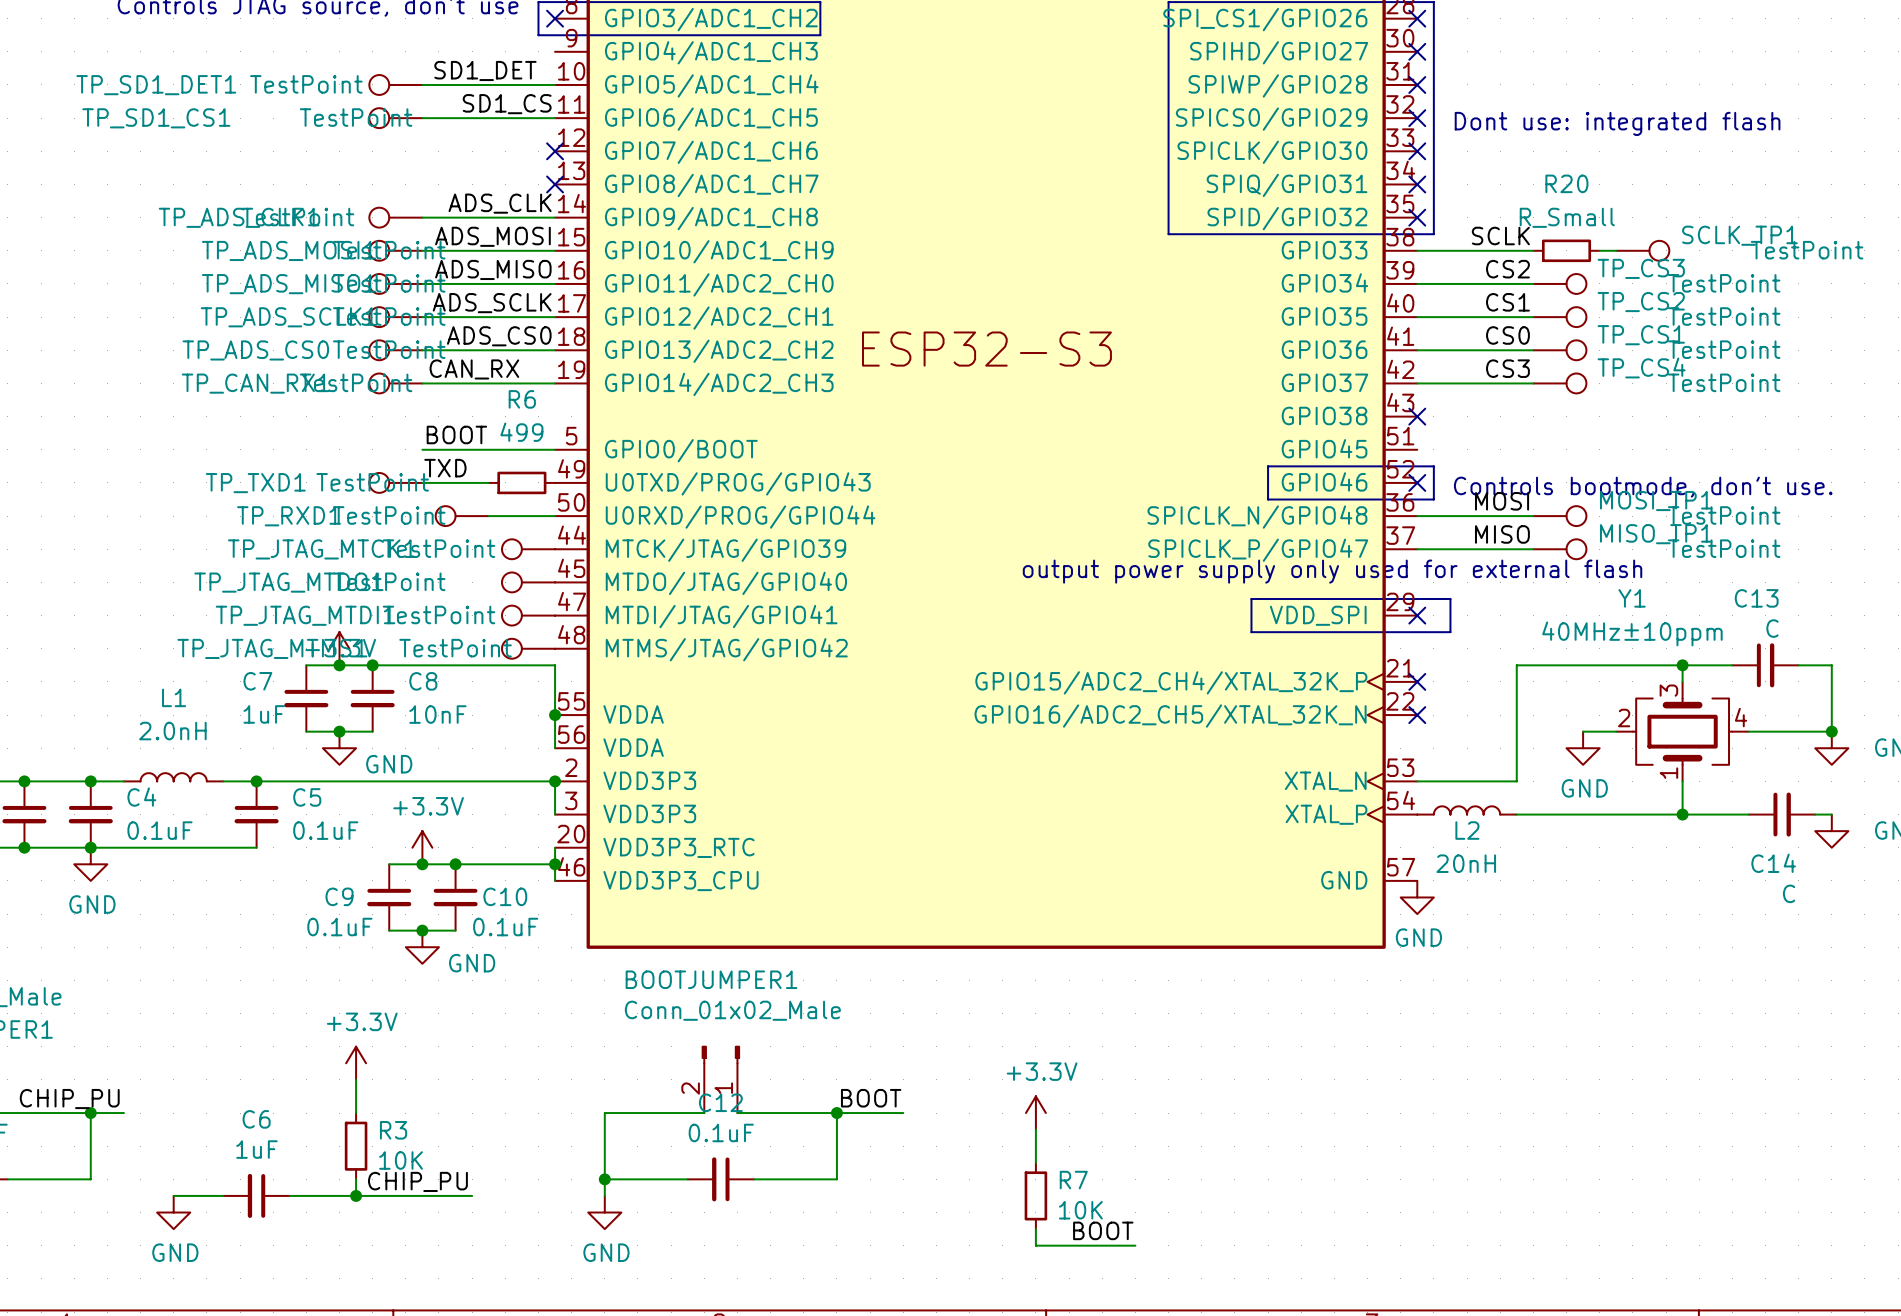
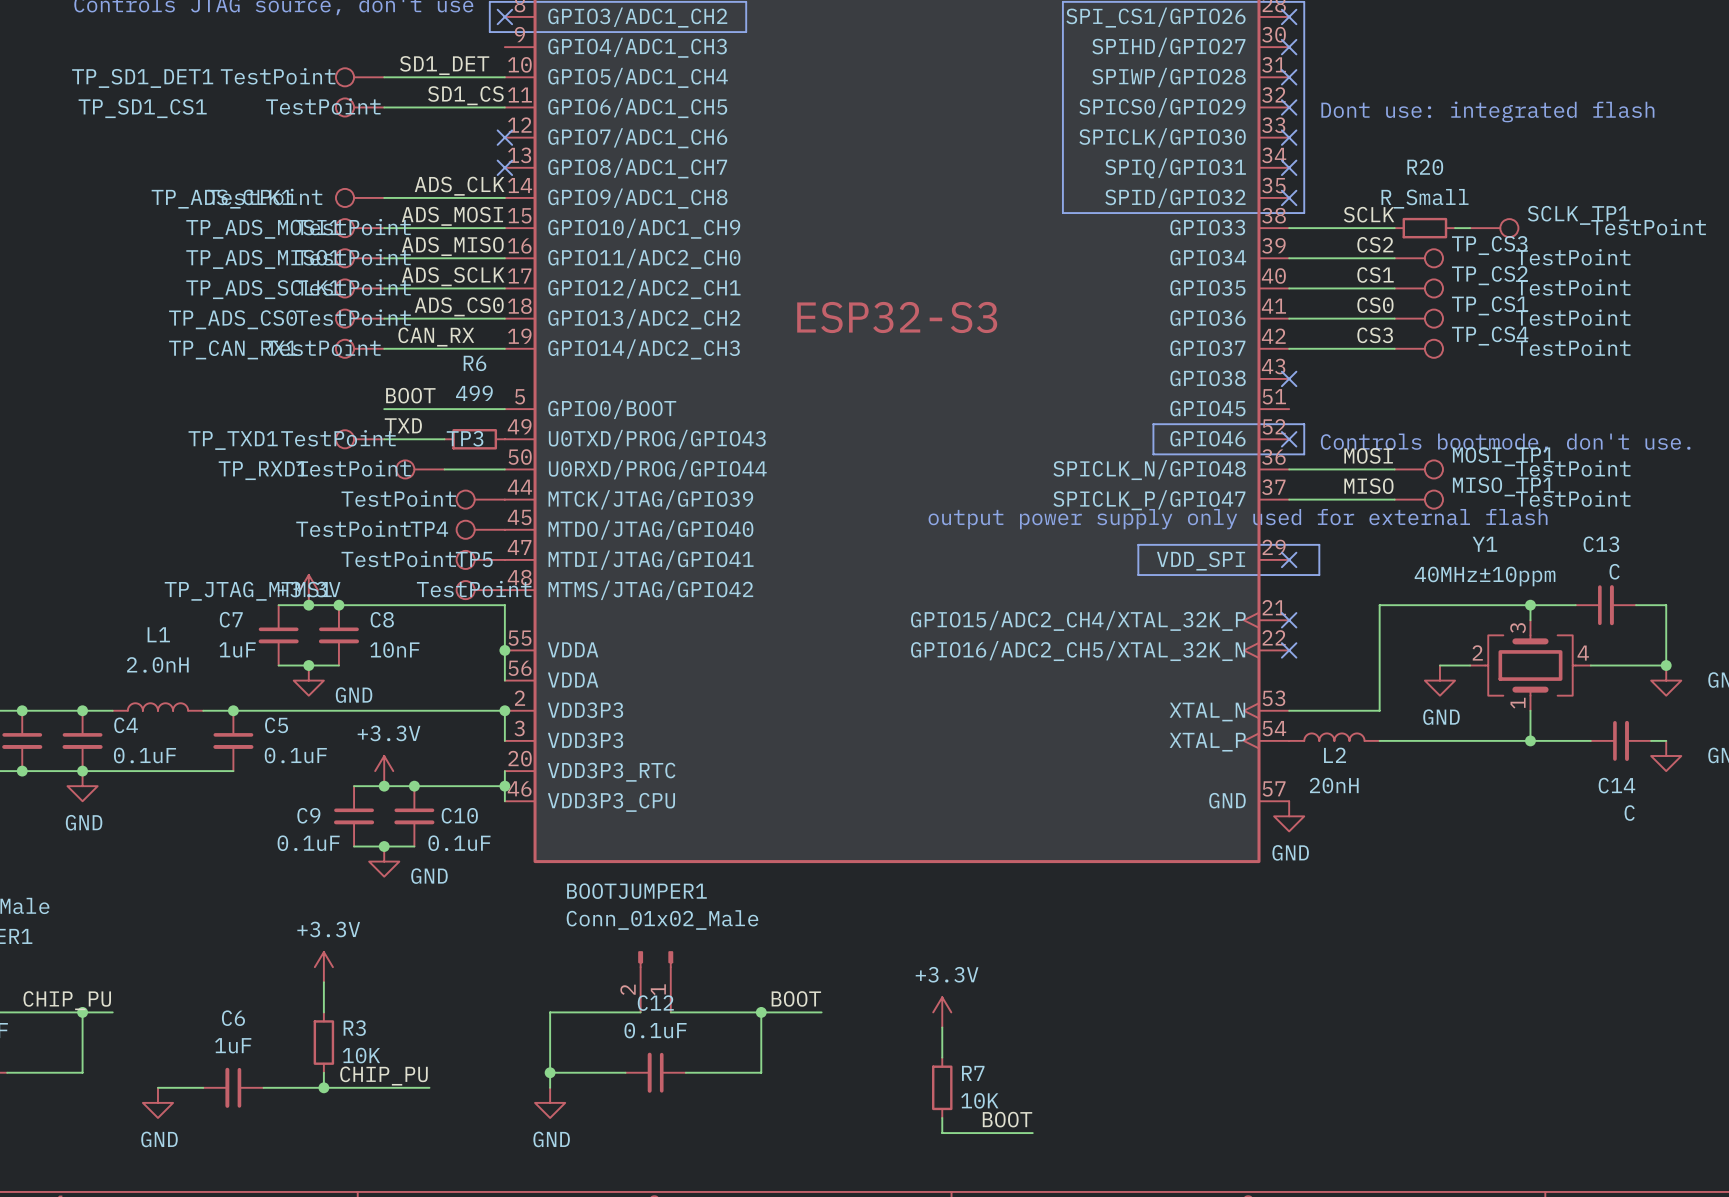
TP_JTAG_MTCK1 name: TP_JTAG_MTCK1 (322, 549) -> TP3 (465, 438)
TP_JTAG_MTDO1 name: TP_JTAG_MTDO1 (288, 582) -> TP4 (429, 529)
TP_JTAG_MTDI1 name: TP_JTAG_MTDI1 (305, 615) -> TP5 (474, 559)
TP_JTAG_MTMS1 value position: TestPoint (455, 648) -> TestPoint (474, 589)

